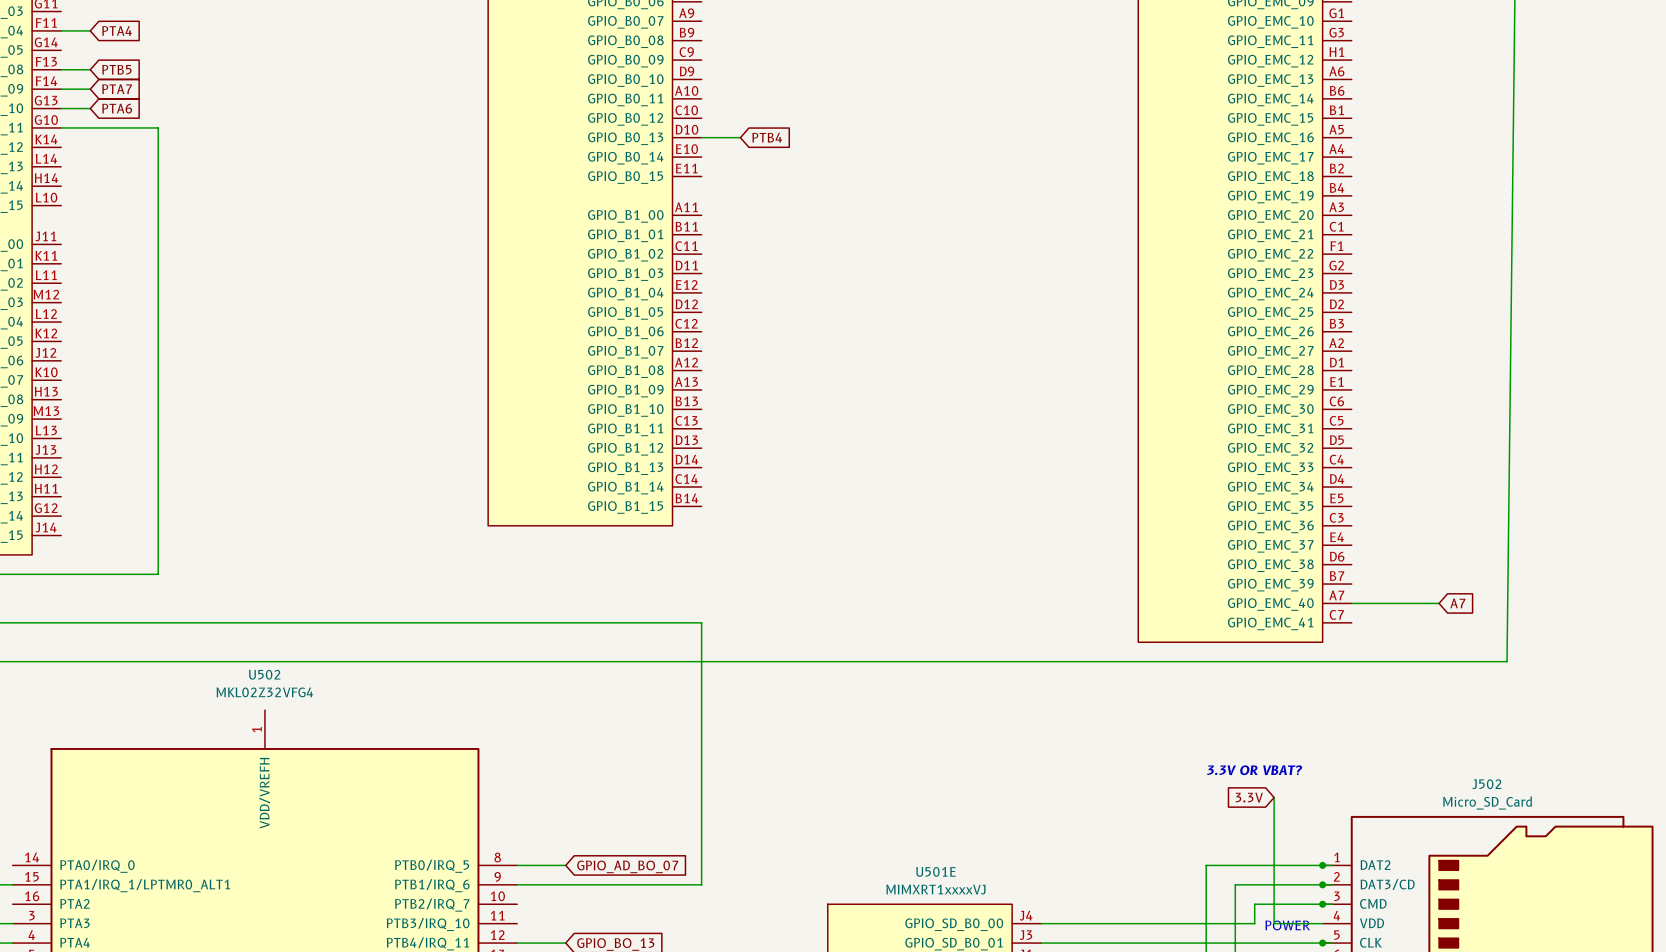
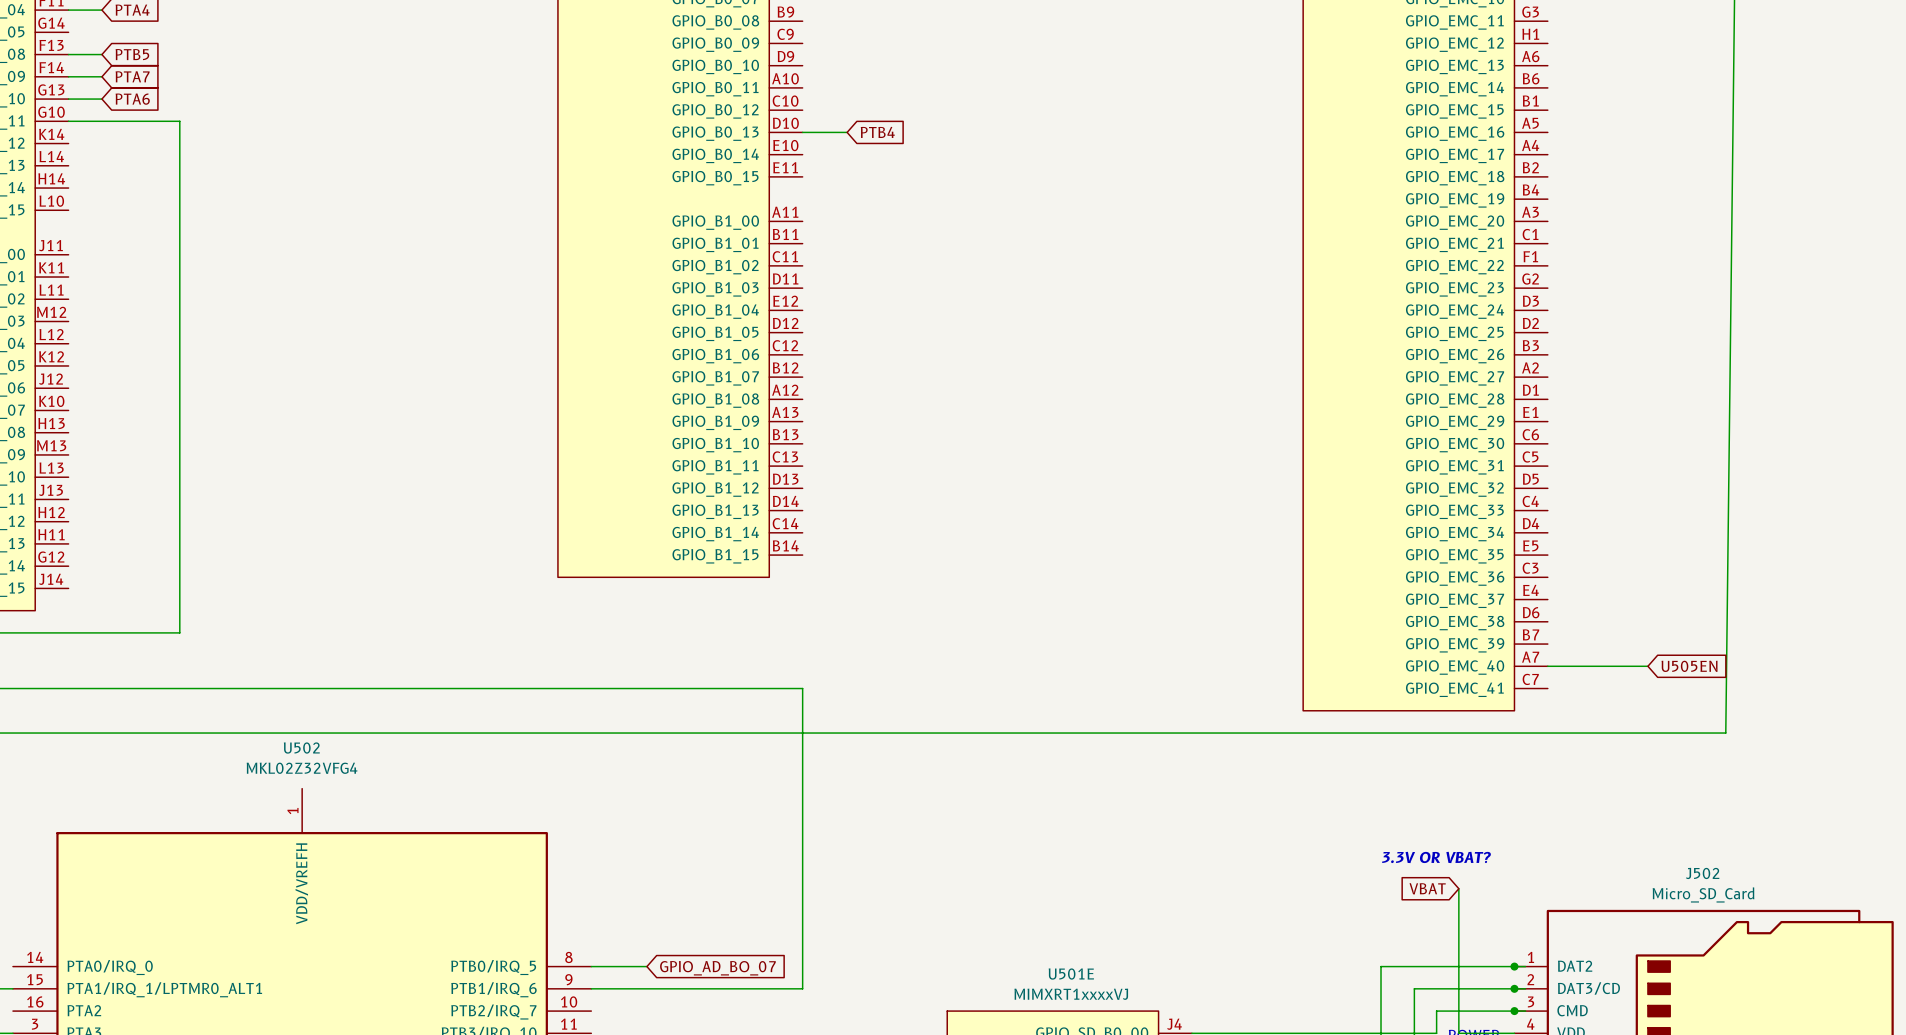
global label: A7 (1457, 603) -> U505EN (1689, 666)
global label: 3.3V (1249, 797) -> VBAT (1427, 888)

